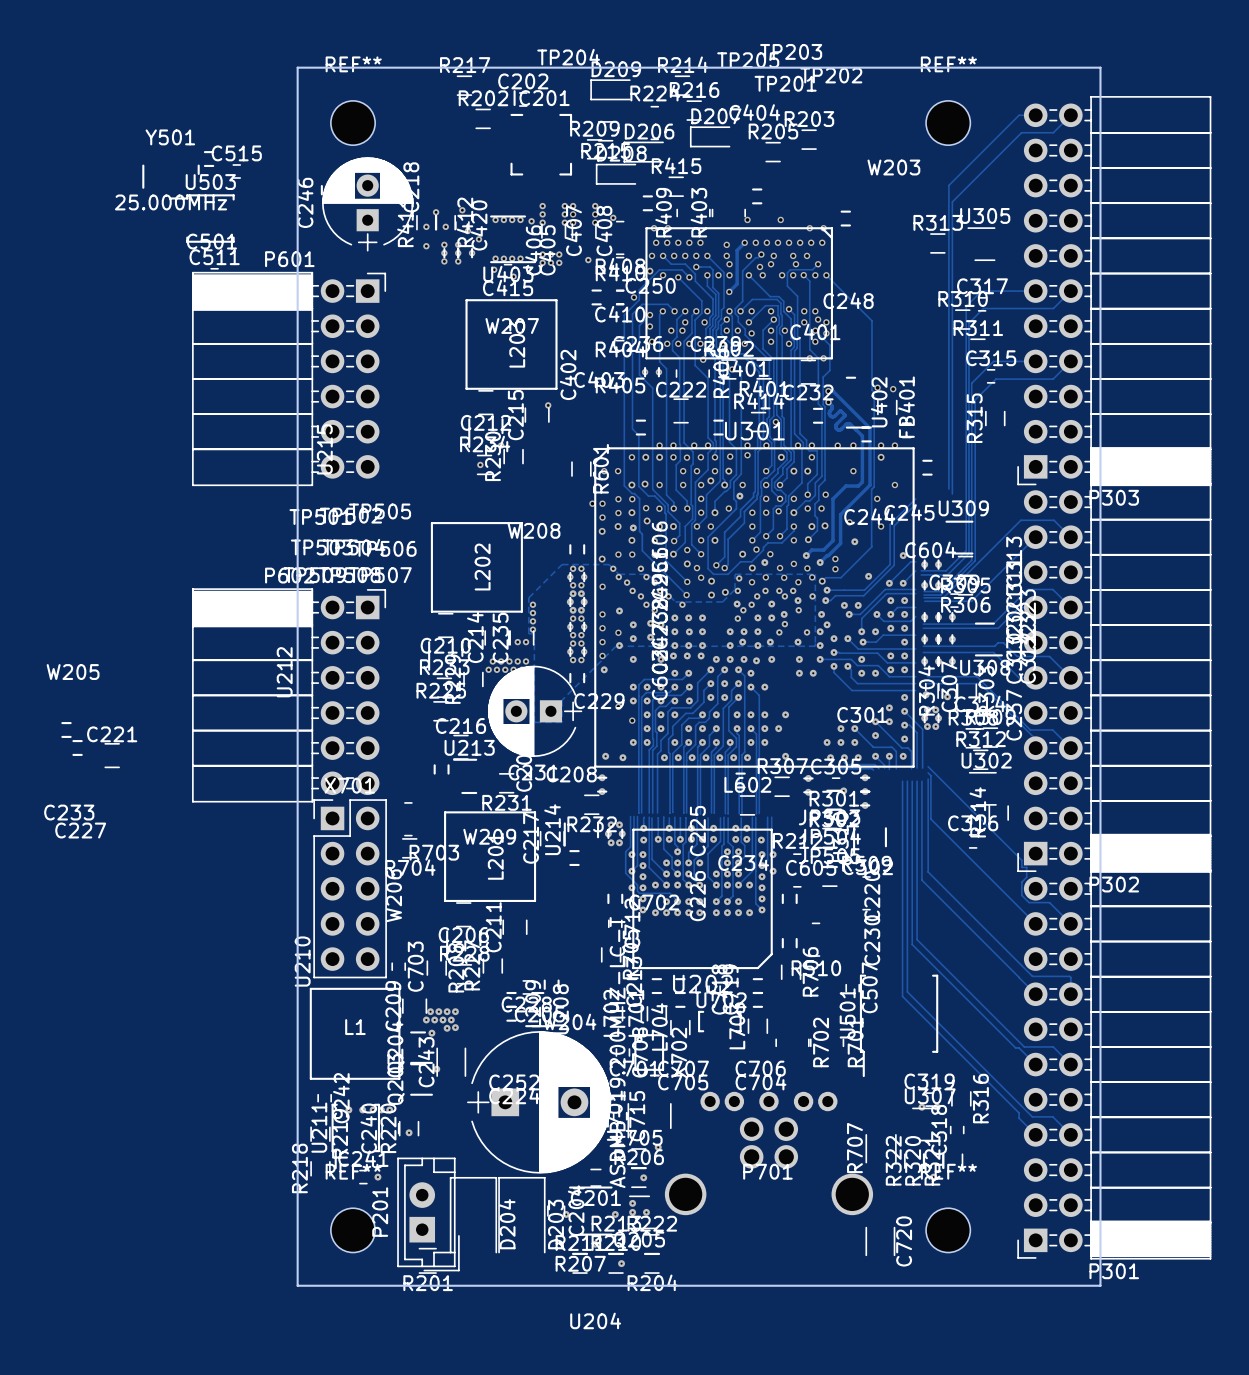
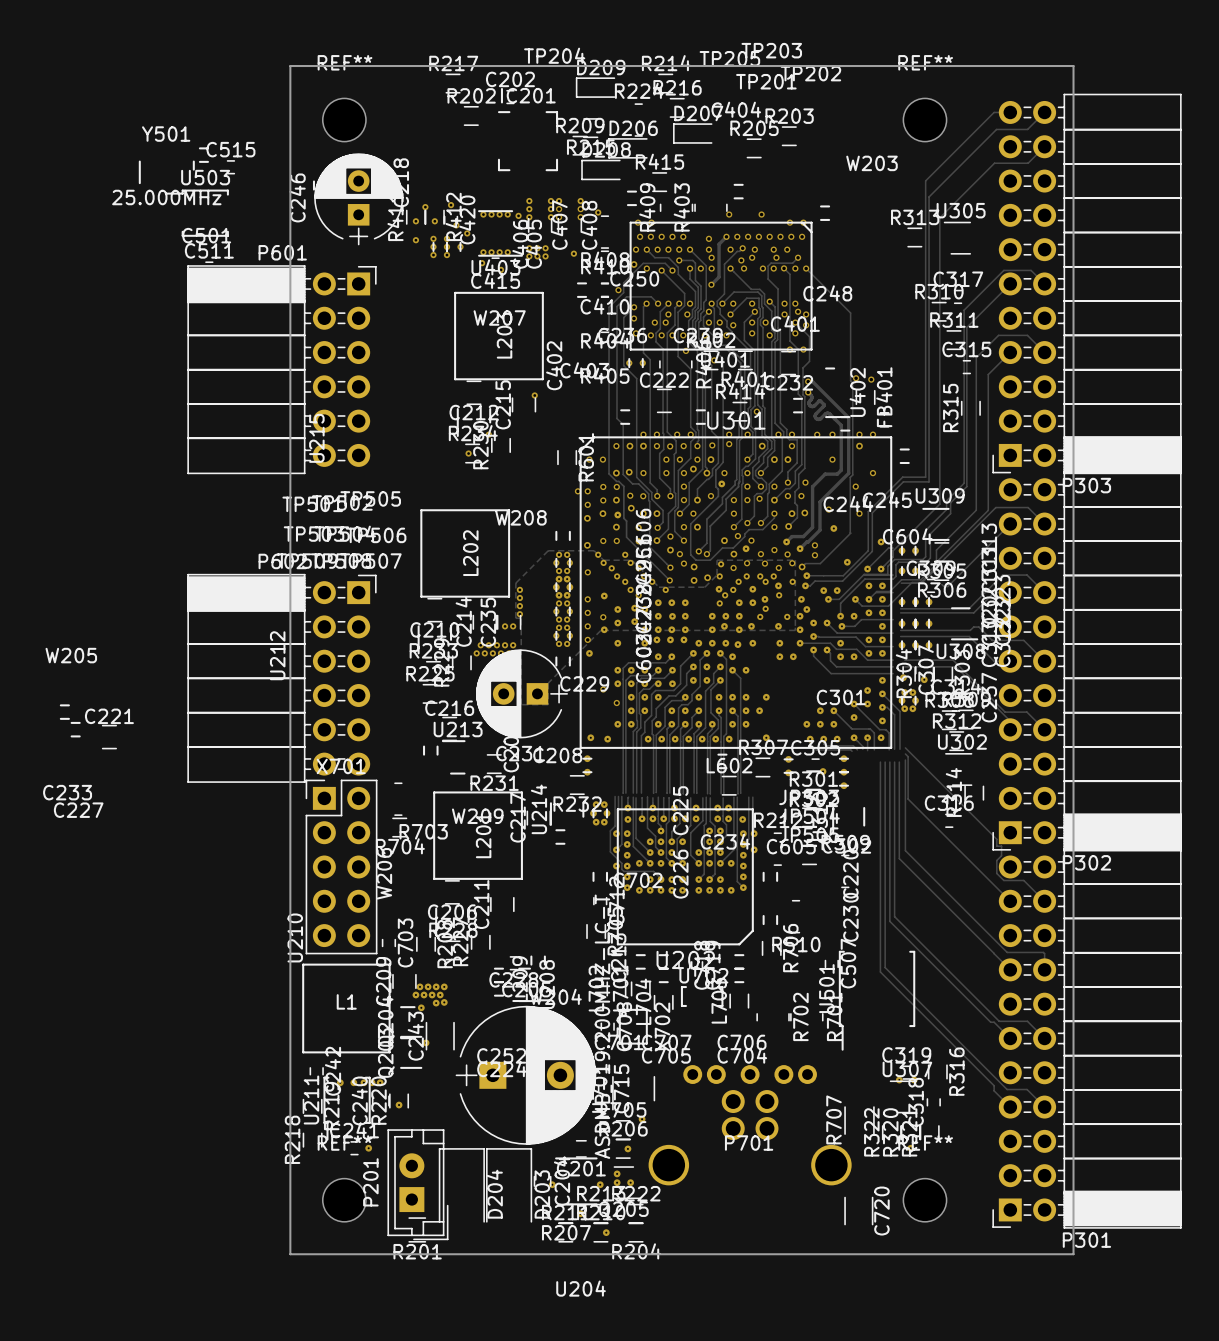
track: none -> (1044, 146) (1028, 163)
track: none -> (1028, 163) (994, 163) (939, 217) (939, 504) (893, 550) (893, 556)
track: (1035, 291) (981, 291) (966, 306) (966, 550) (946, 570) (921, 570) -> (1010, 283) (966, 327) (966, 486) (950, 502) (950, 513) (930, 533) (930, 558) (926, 562) (898, 562) (895, 564) (895, 576) (893, 579)
track: (1070, 291) (1053, 308) (983, 308) (968, 323) (968, 553) (947, 574) (921, 574) -> (1044, 283) (1031, 270) (1003, 270) (964, 310) (964, 483) (946, 500) (946, 509) (925, 530) (925, 556) (922, 559) (894, 559) (887, 566) (887, 574) (863, 575)
track: (1035, 361) (993, 361) (971, 383) (971, 560) (940, 591) (923, 591) -> (1010, 352) (988, 374) (988, 510) (939, 559) (939, 565) (922, 582) (912, 582) (893, 601)
track: (1070, 361) (1053, 379) (995, 379) (975, 399) (975, 560) (940, 595) (923, 595) -> (1044, 352) (1027, 335) (998, 335) (976, 357) (976, 510) (936, 550) (936, 564) (920, 579) (901, 579) (889, 591) (875, 592)
track: none -> (925, 477) (902, 477) (893, 486)
track: none -> (929, 481) (903, 481) (893, 492)
track: (924, 601) (967, 601) -> (941, 584) (943, 586)

